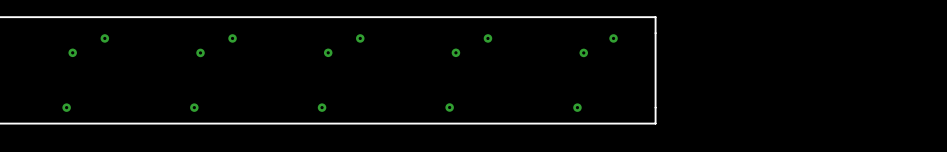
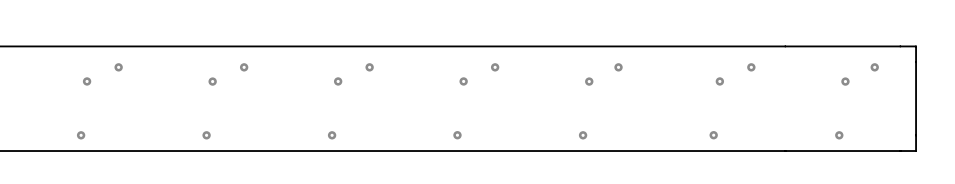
board edge: (655, 17) (655, 123) -> (659, 46) (916, 46) (916, 151) (659, 151)
via: none -> (751, 67)
via: none -> (874, 67)
via: none -> (719, 81)
via: none -> (845, 81)
via: none -> (713, 135)
via: none -> (839, 135)

